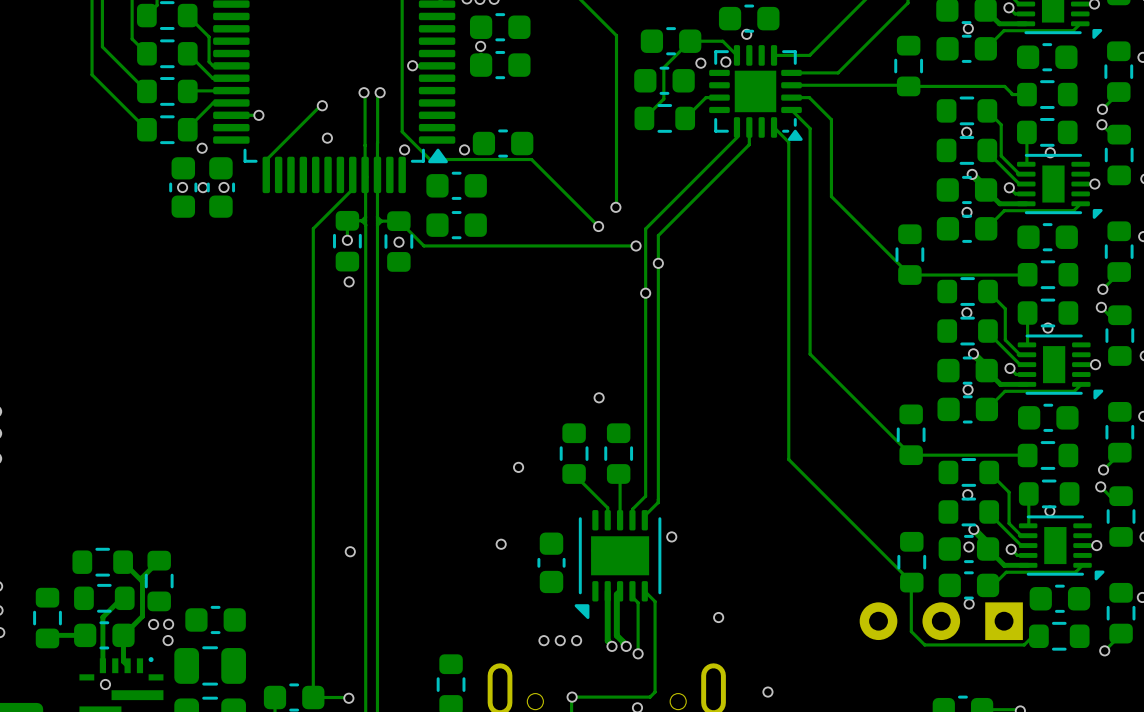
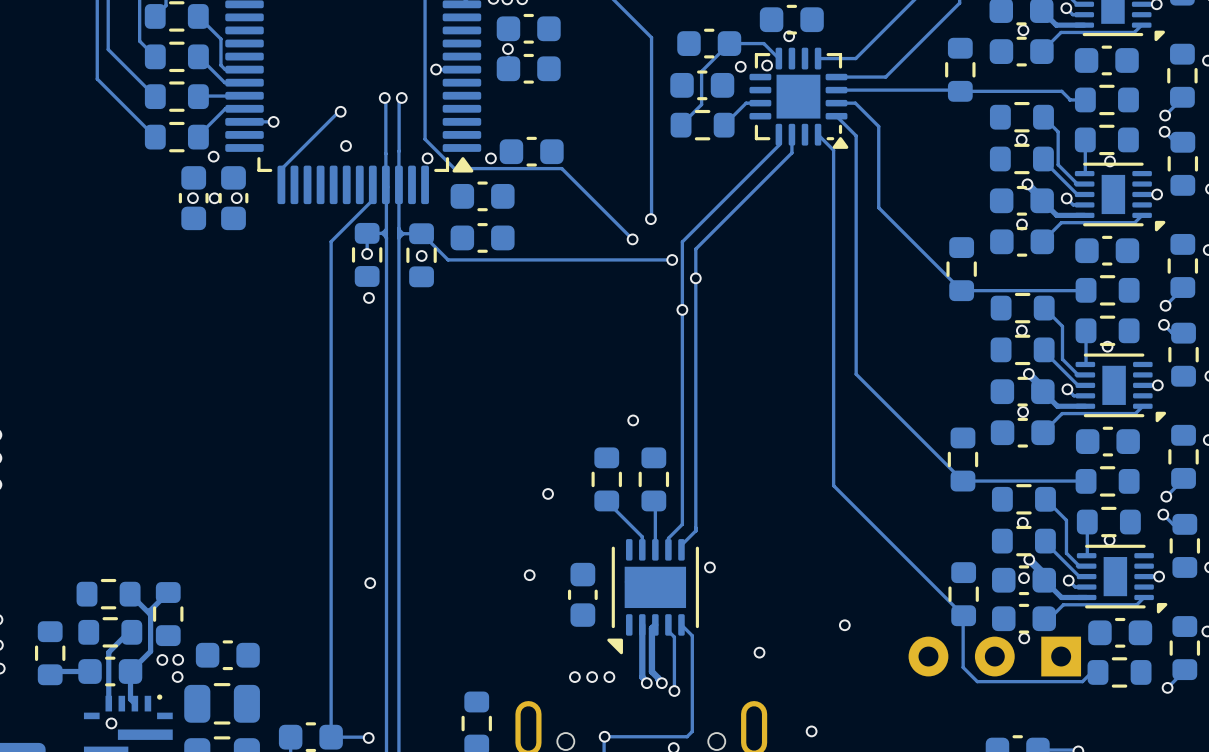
via: none -> (844, 625)

